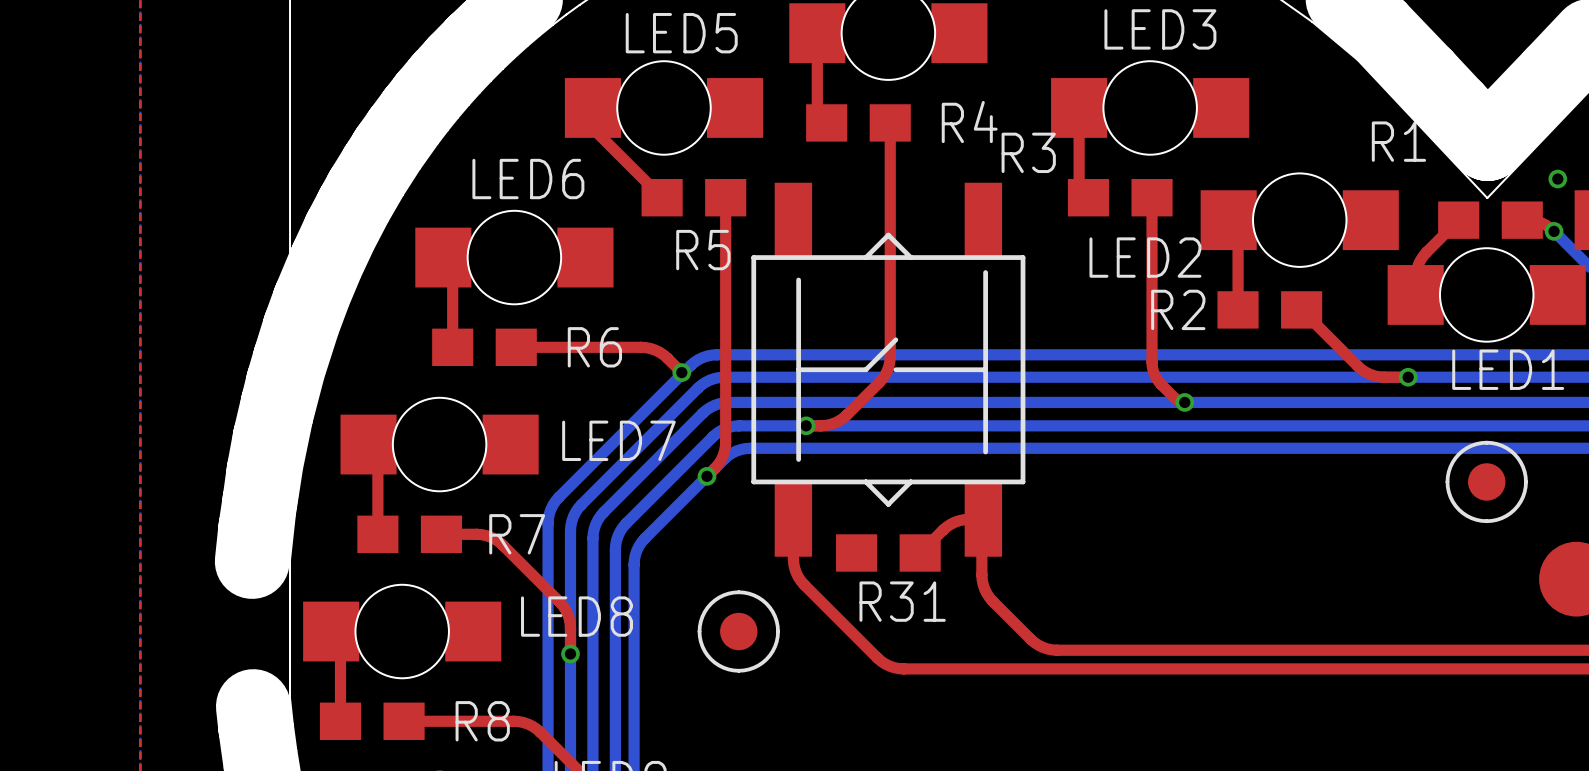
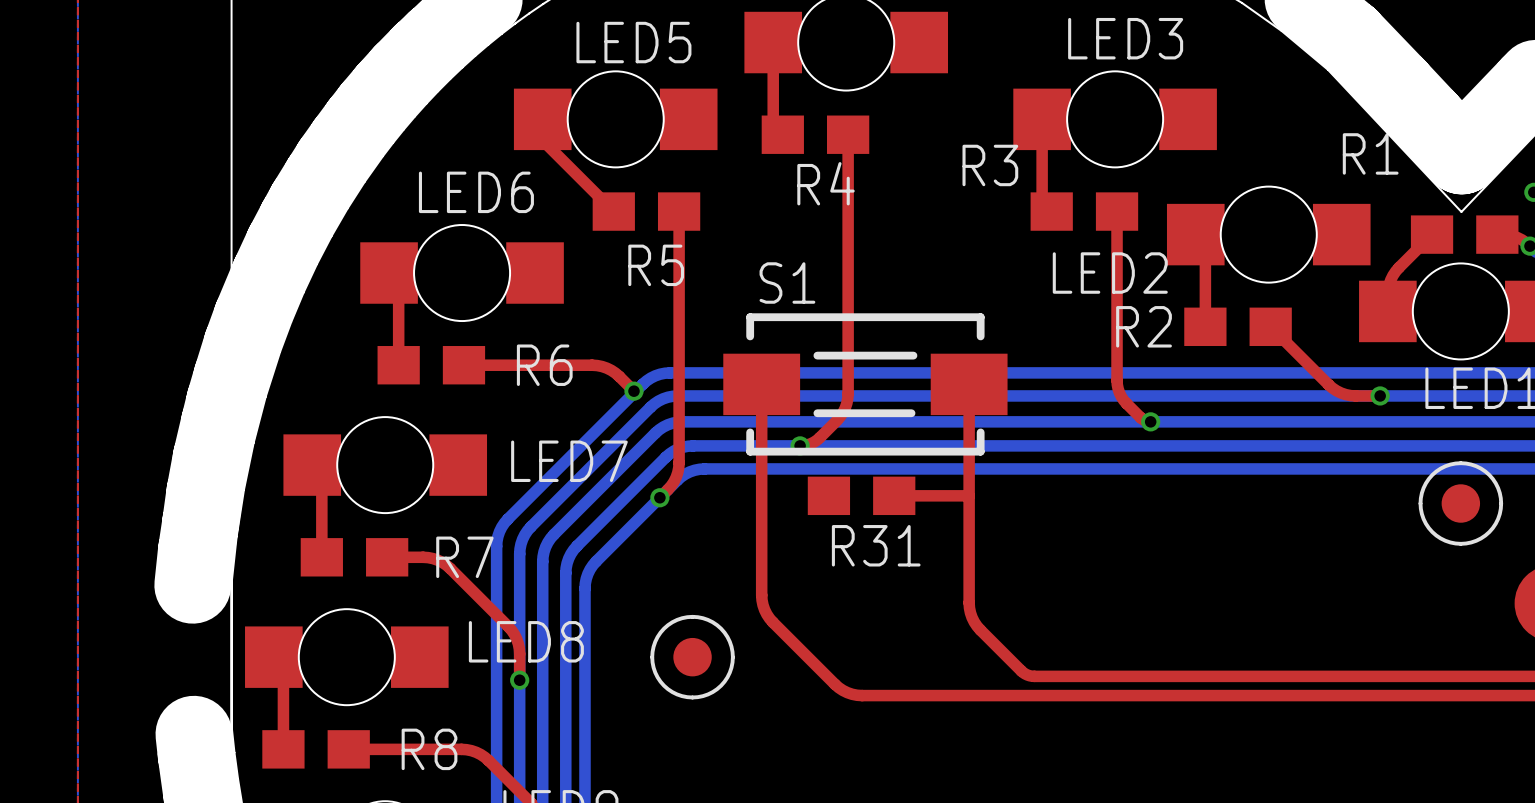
R4 name position: R4 (969, 122) -> R4 (826, 183)
top track: (890, 356) (887, 370) (882, 378) (843, 418) (830, 424) (806, 425) -> (848, 374) (847, 398) (840, 416) (817, 440) (800, 445)
S1: none -> (865, 384)
part: (888, 369) -> none
via position: (806, 425) -> (800, 445)
top track: none -> (894, 495) (969, 495)
top track: (793, 519) (794, 568) (801, 581) (817, 597) -> (761, 384) (761, 595) (764, 609) (772, 622)
R31 position: (888, 552) -> (861, 495)
top track: (920, 552) (950, 524) (964, 519) (983, 519) (982, 579) (989, 597) (1038, 645) (1052, 649) (1071, 650) -> (969, 384) (970, 612) (977, 626) (1021, 670) (1034, 676)

